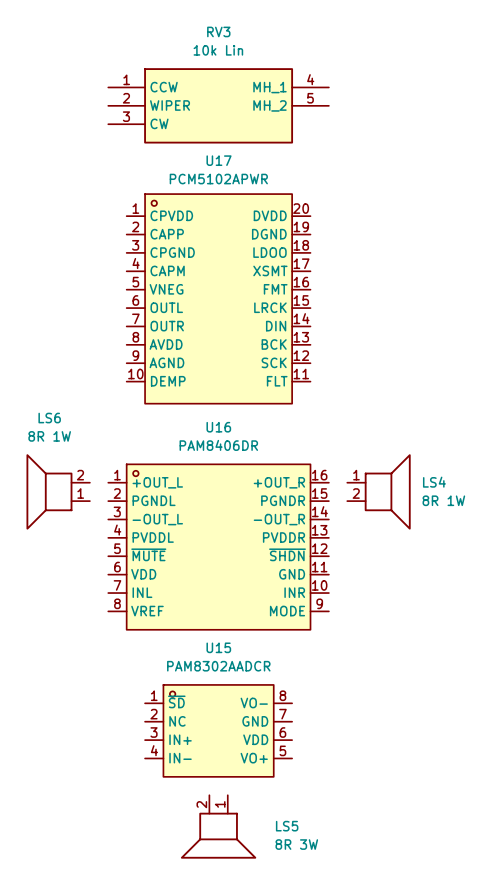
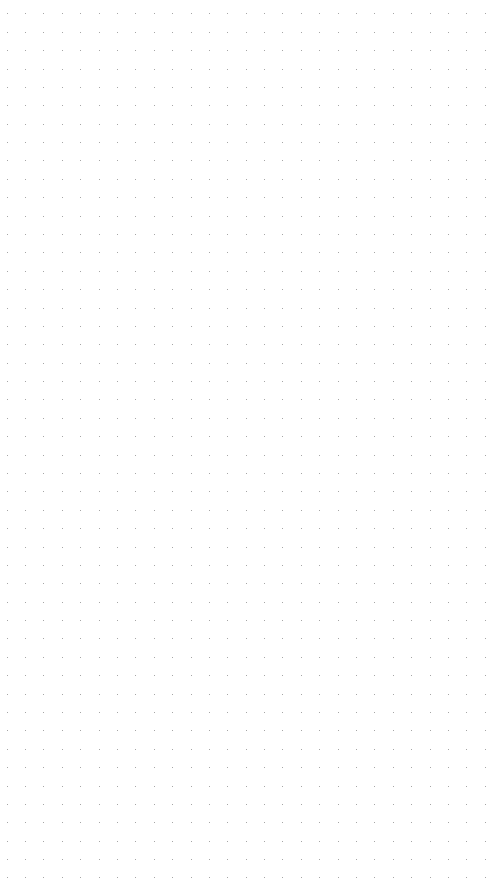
RV3: 10k Lin (218, 105) -> none
U17: PCM5102APWR (218, 298) -> none
LS6: 8R 1W (58, 491) -> none
LS4: 8R 1W (378, 491) -> none
U16: PAM8406DR (218, 547) -> none
U15: PAM8302AADCR (218, 730) -> none
LS5: 8R 3W (218, 826) -> none

